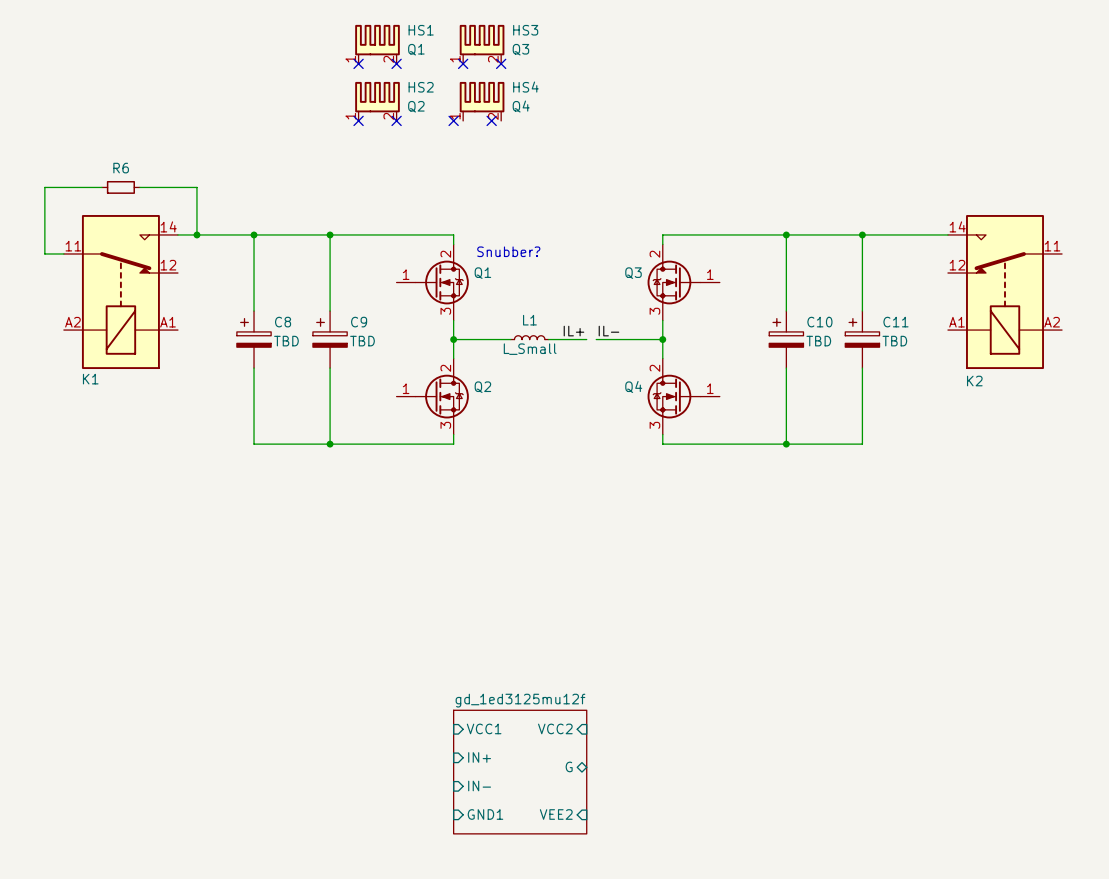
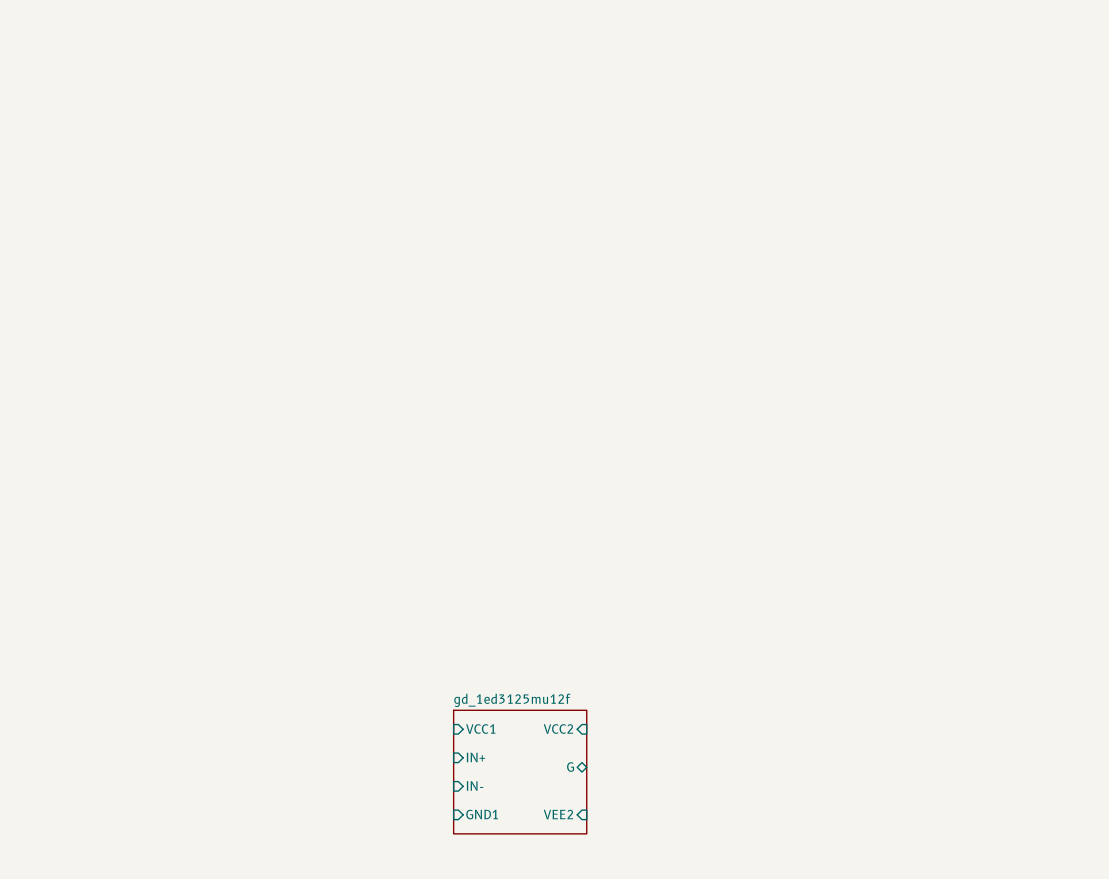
HS1: Q1 (377, 44) -> none
HS3: Q3 (482, 44) -> none
no-connect mark: (358, 63) -> none
no-connect mark: (396, 63) -> none
no-connect mark: (463, 63) -> none
no-connect mark: (501, 63) -> none
HS2: Q2 (377, 101) -> none
HS4: Q4 (482, 101) -> none
no-connect mark: (358, 120) -> none
no-connect mark: (396, 120) -> none
no-connect mark: (453, 120) -> none
no-connect mark: (491, 120) -> none
wire: (101, 187) (44, 187) (44, 253) (63, 253) -> none
R6: (120, 187) -> none
wire: (139, 187) (196, 187) (196, 234) -> none
wire: (177, 234) (453, 234) (453, 244) -> none
junction: (196, 234) -> none
wire: (254, 234) (254, 311) -> none
junction: (254, 234) -> none
wire: (330, 234) (330, 311) -> none
junction: (330, 234) -> none
wire: (786, 234) (786, 311) -> none
junction: (786, 234) -> none
wire: (862, 234) (862, 311) -> none
junction: (862, 234) -> none
wire: (947, 234) (662, 234) (662, 244) -> none
text: Snubber? (508, 251) -> none
Q1: (432, 282) -> none
Q3: (683, 282) -> none
K1: (120, 292) -> none
K2: (1005, 292) -> none
wire: (453, 320) (453, 358) -> none
wire: (662, 320) (662, 358) -> none
label: IL+ (573, 331) -> none
label: IL- (608, 331) -> none
L1: L_Small (529, 337) -> none
C8: TBD (254, 339) -> none
C9: TBD (330, 339) -> none
wire: (453, 339) (510, 339) -> none
junction: (453, 339) -> none
wire: (548, 339) (586, 339) -> none
wire: (596, 339) (662, 339) -> none
junction: (662, 339) -> none
C10: TBD (786, 339) -> none
C11: TBD (862, 339) -> none
wire: (254, 368) (254, 444) (453, 444) (453, 434) -> none
wire: (330, 368) (330, 444) -> none
wire: (786, 368) (786, 444) -> none
wire: (862, 368) (862, 444) (662, 444) (662, 434) -> none
Q2: (432, 396) -> none
Q4: (683, 396) -> none
junction: (330, 444) -> none
junction: (786, 444) -> none

